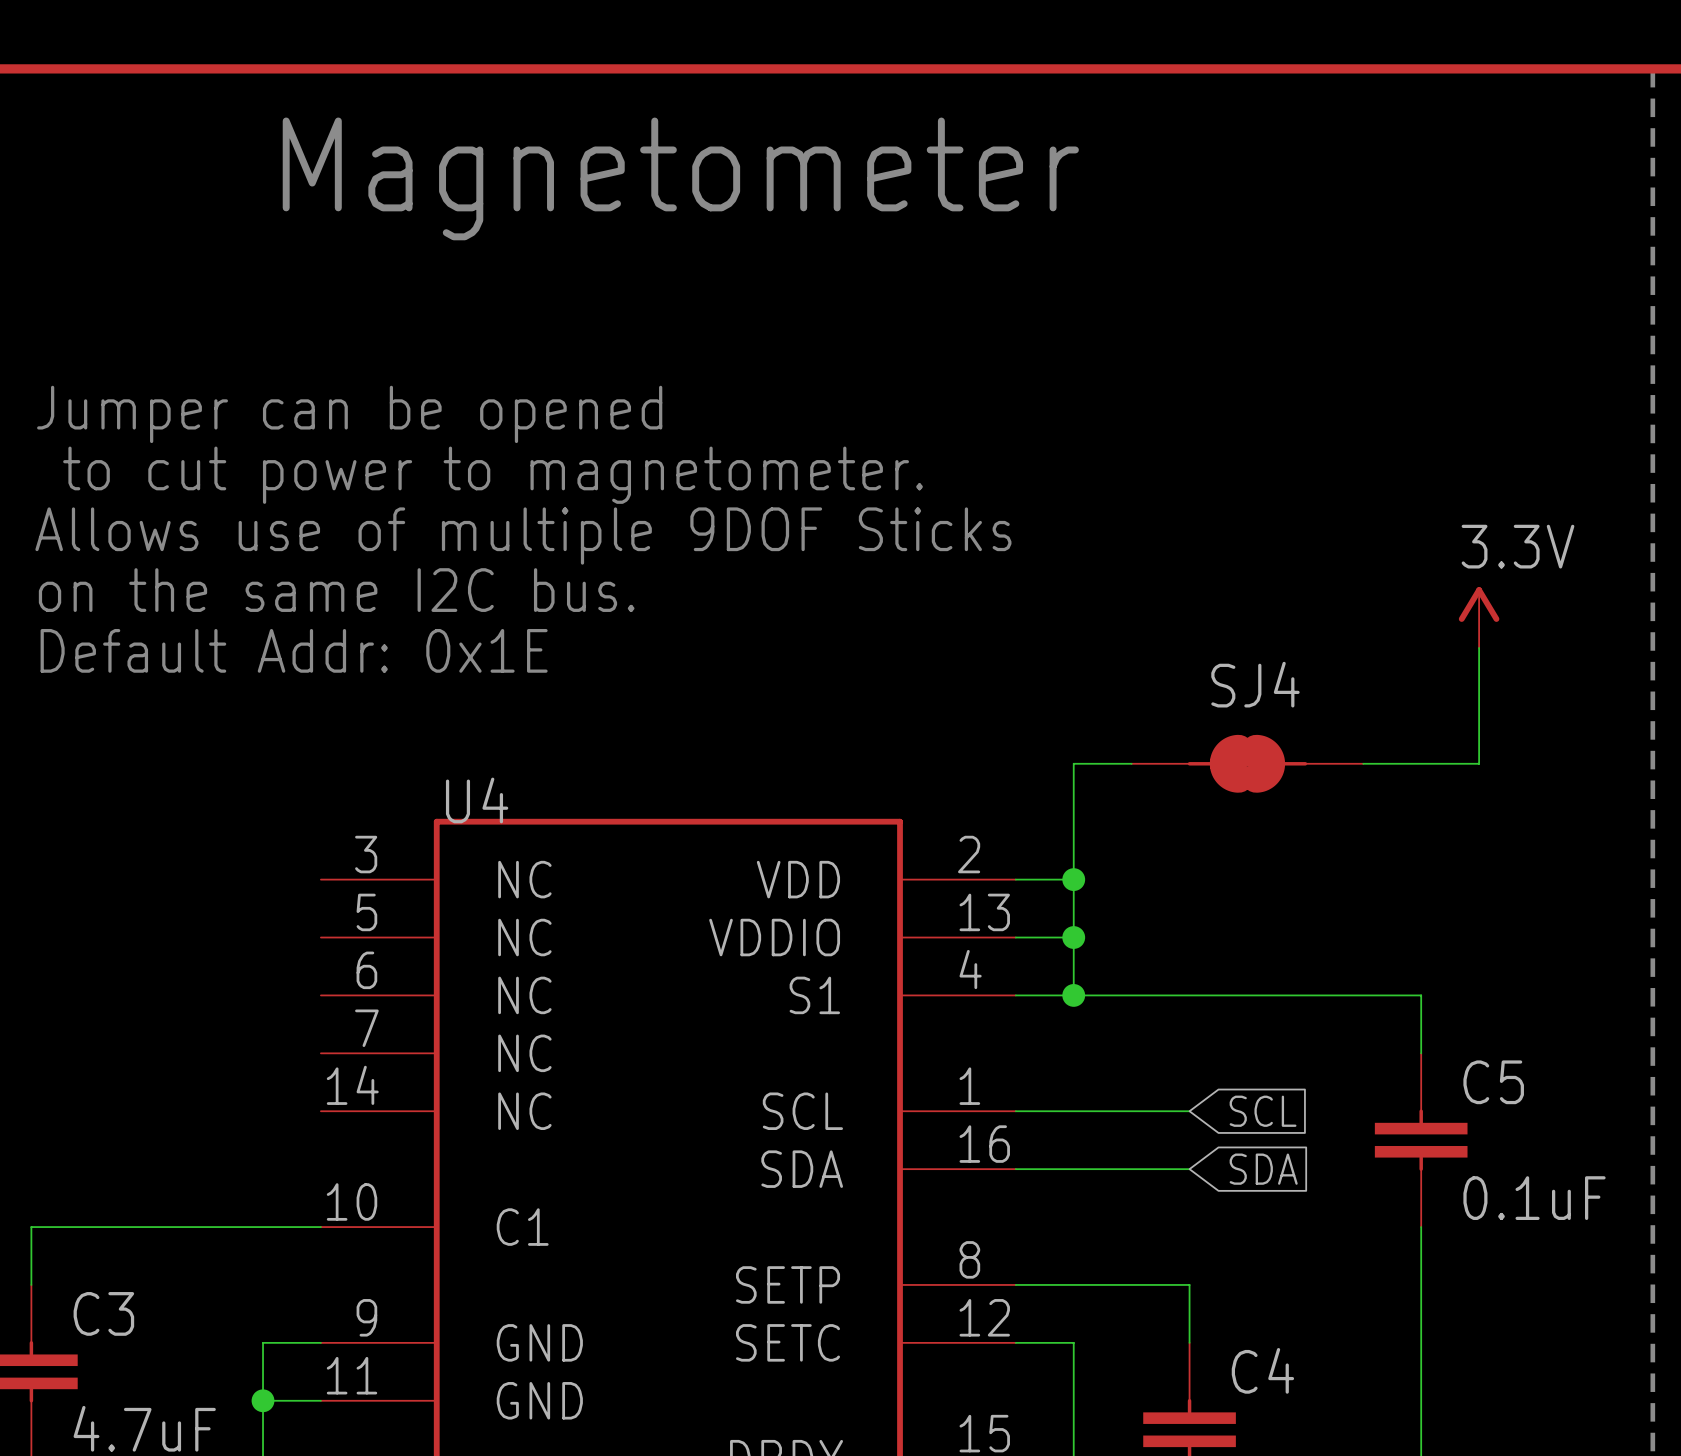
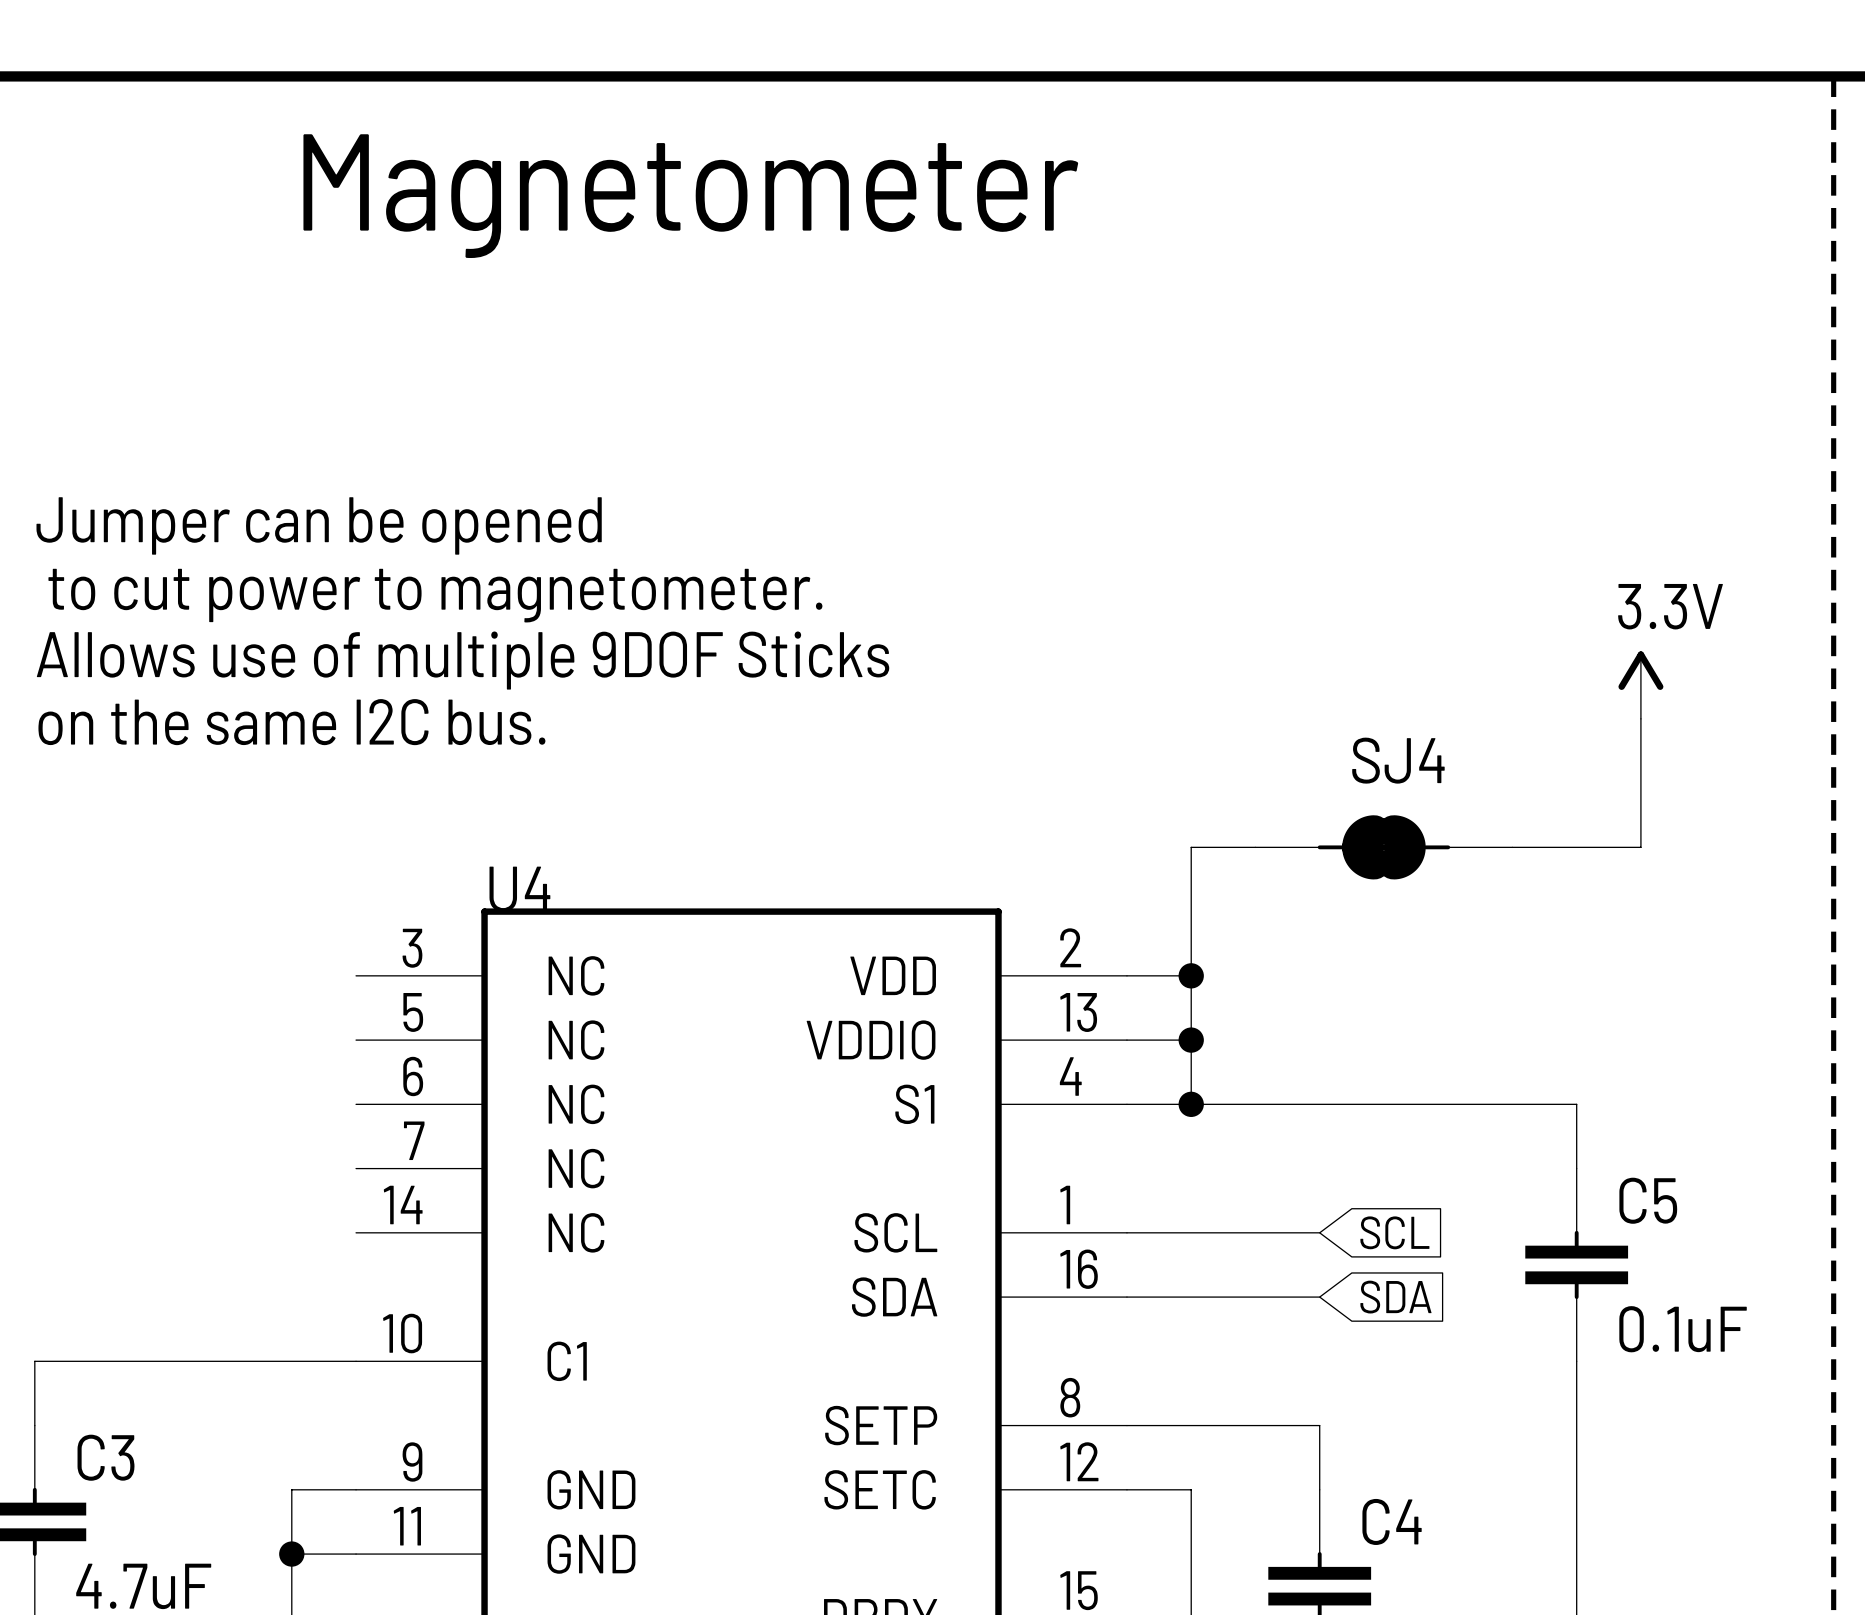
text: Jumper can be opened (349, 414) -> none
text: to cut power to magnetometer. (493, 475) -> Jumper can be opened (319, 525)
text: Allows use of multiple 9DOF Sticks (523, 536) -> to cut power to magnetometer. (435, 595)
text: on the same I2C bus. (336, 590) -> Allows use of multiple 9DOF Sticks (462, 660)
text: Default Addr: 0x1E (294, 650) -> on the same I2C bus. (291, 722)

